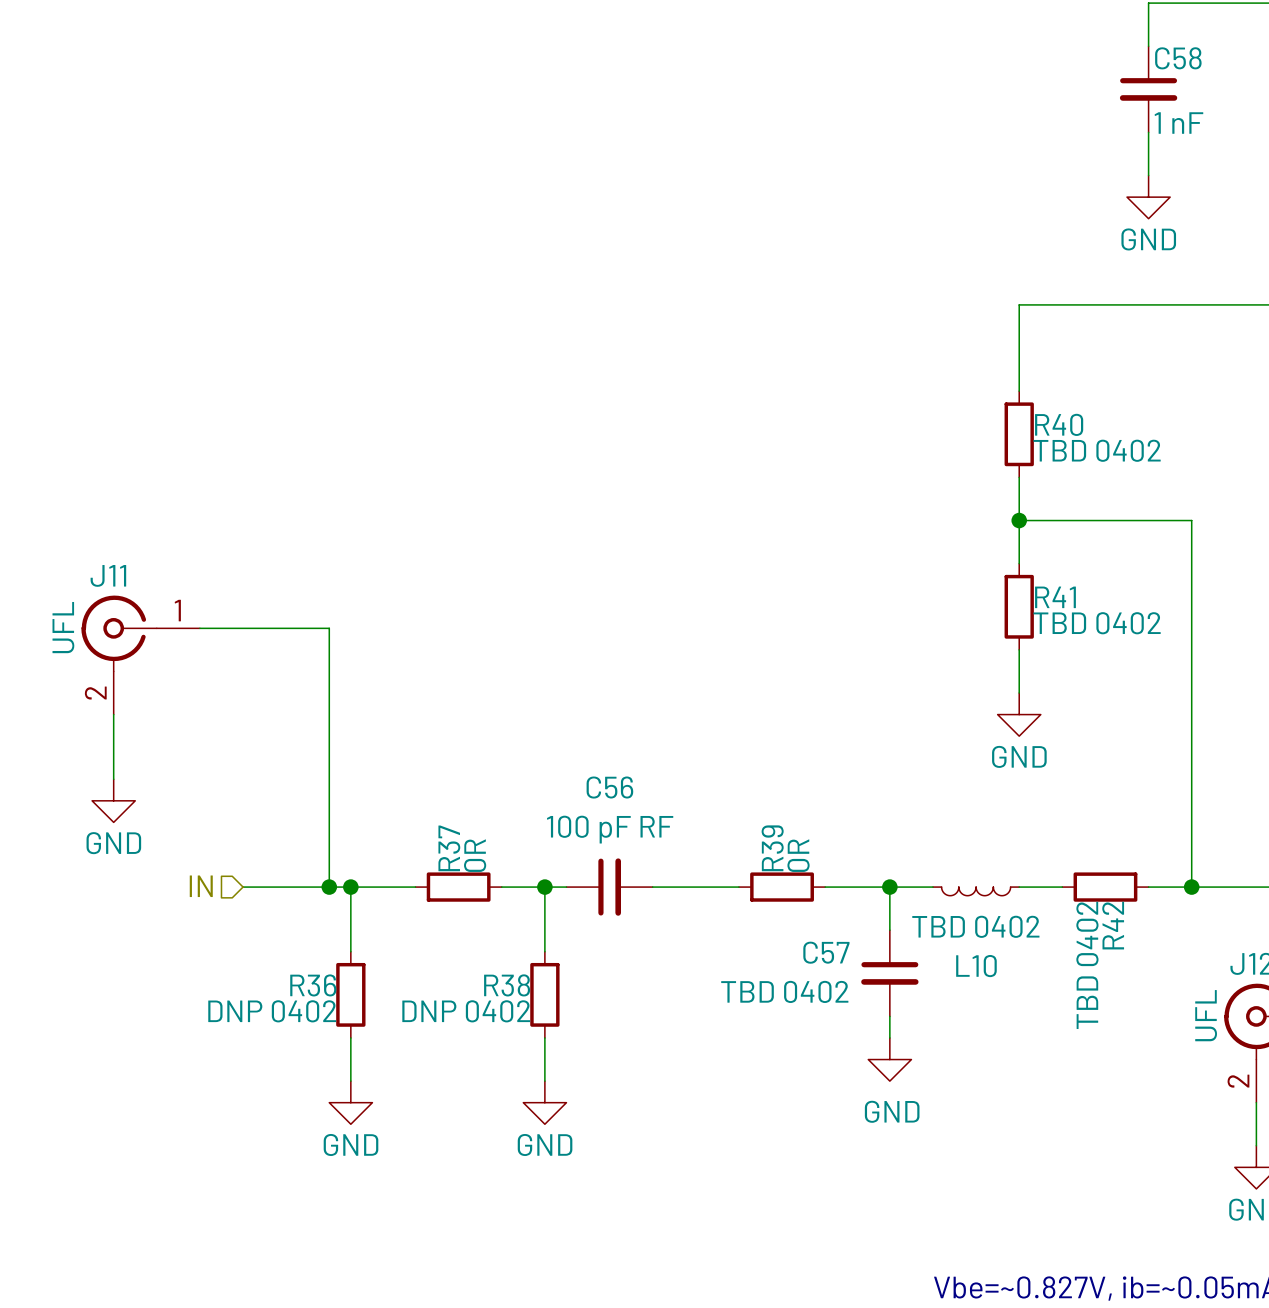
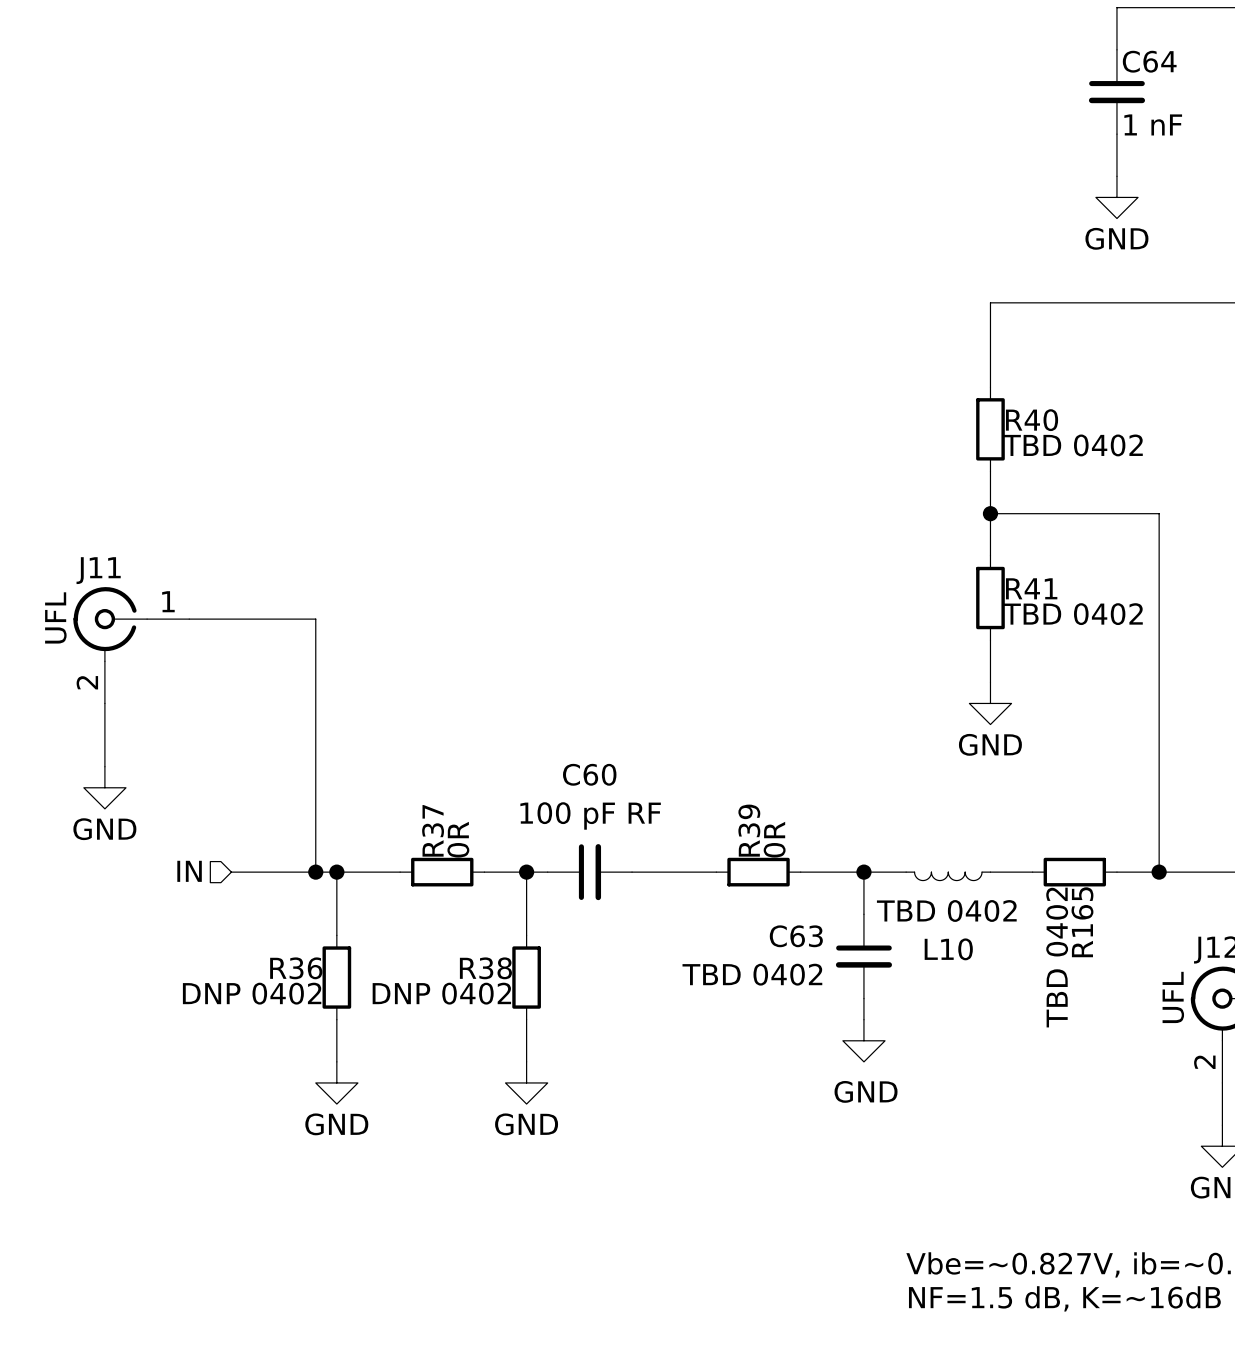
C58 name: C58 (1178, 58) -> C64 (1149, 61)
C56 name: C56 (609, 787) -> C60 (589, 774)
R42 name: R42 (1113, 925) -> R165 (1082, 922)
C57 name: C57 (826, 952) -> C63 (796, 936)

